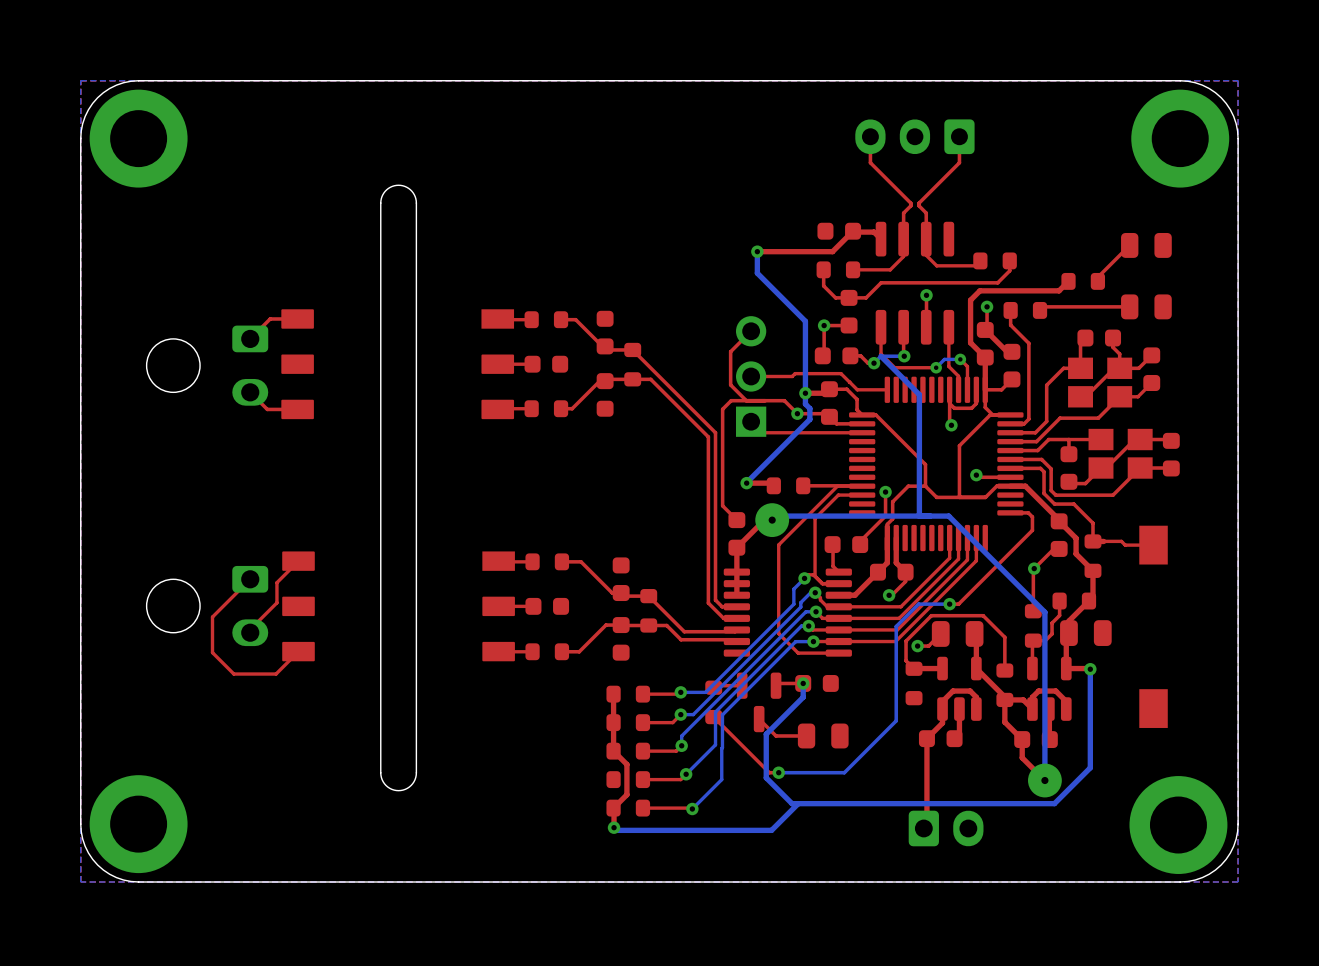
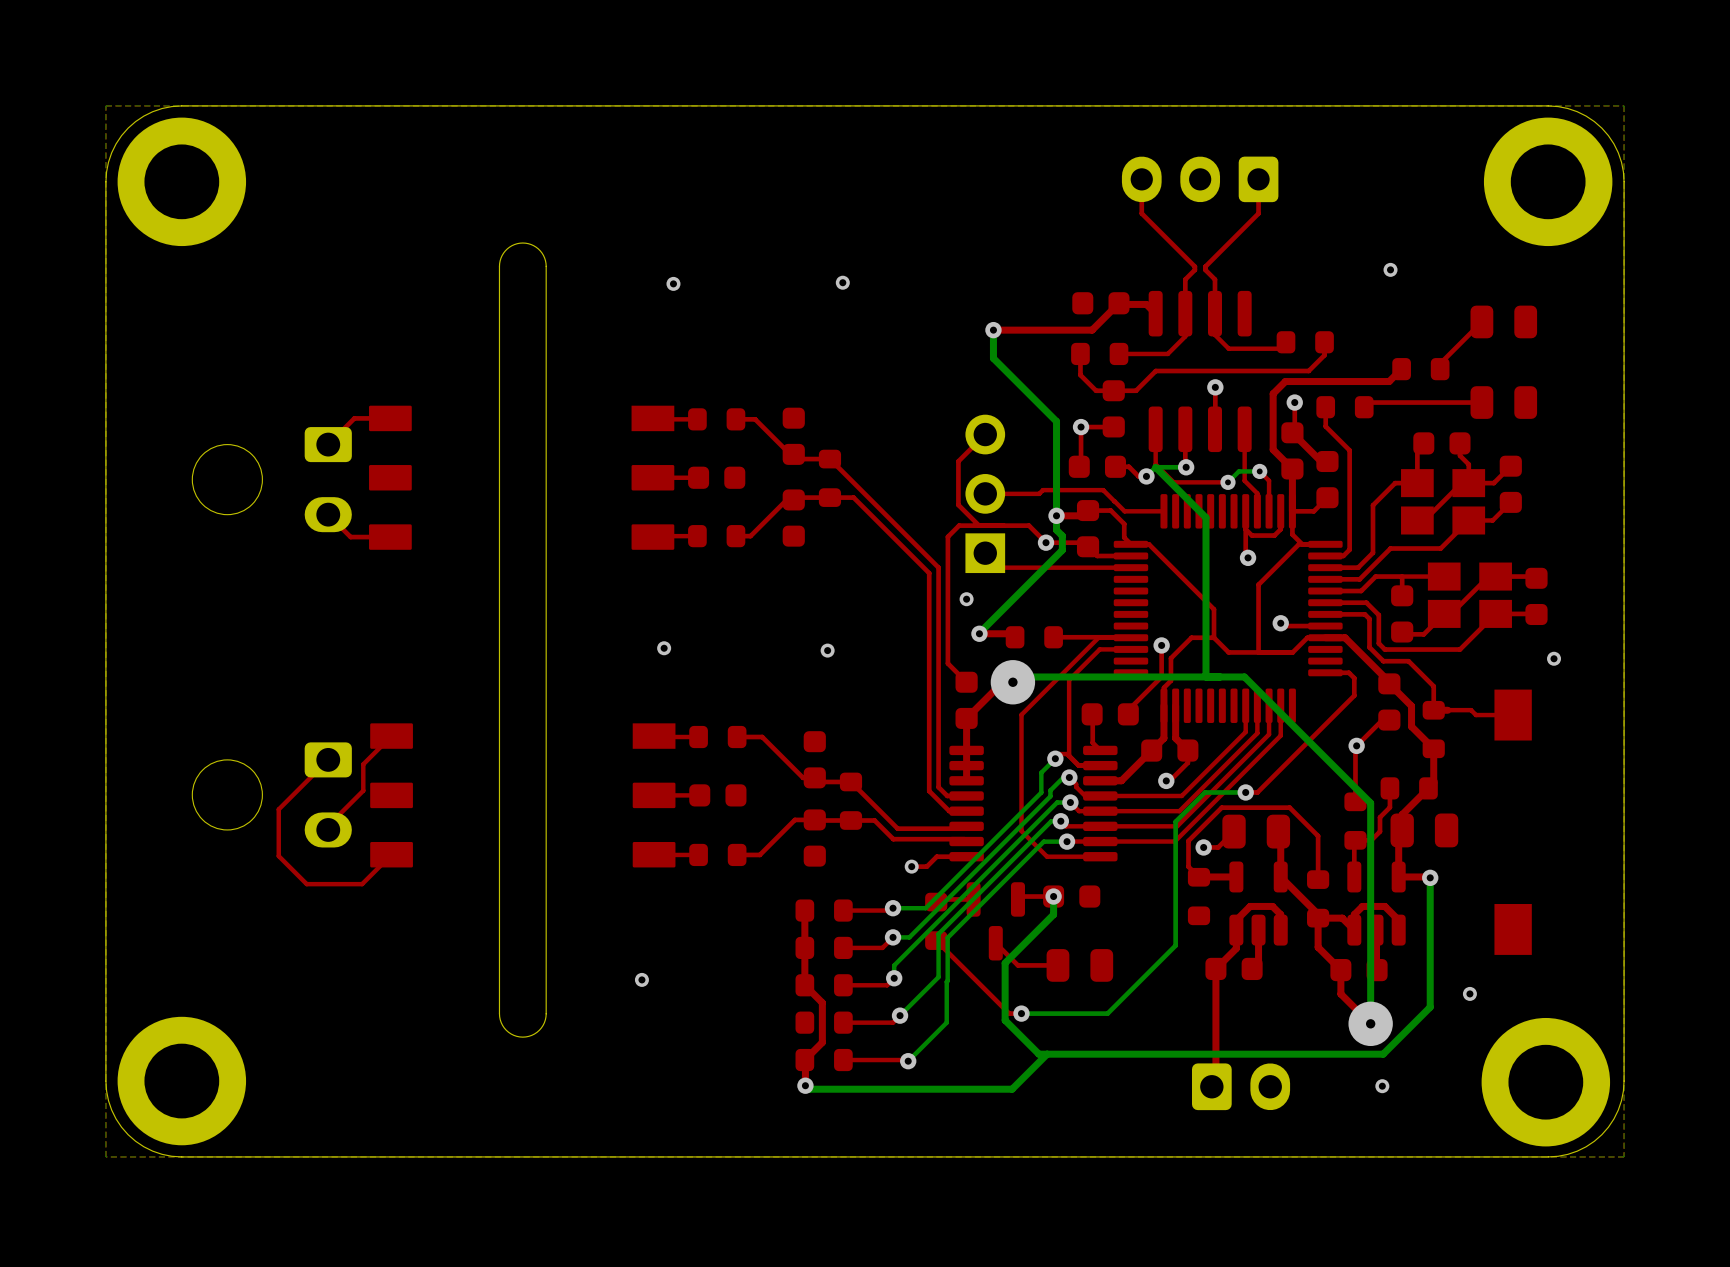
via: none -> (1390, 269)
via: none -> (842, 282)
via: none -> (673, 283)
via: none -> (966, 599)
via: none -> (664, 648)
via: none -> (827, 650)
via: none -> (1554, 658)
top track: none -> (966, 856) (936, 856) (926, 866) (911, 866)
via: none -> (911, 866)
via: none -> (641, 979)
via: none -> (1469, 993)
via: none -> (1382, 1086)

